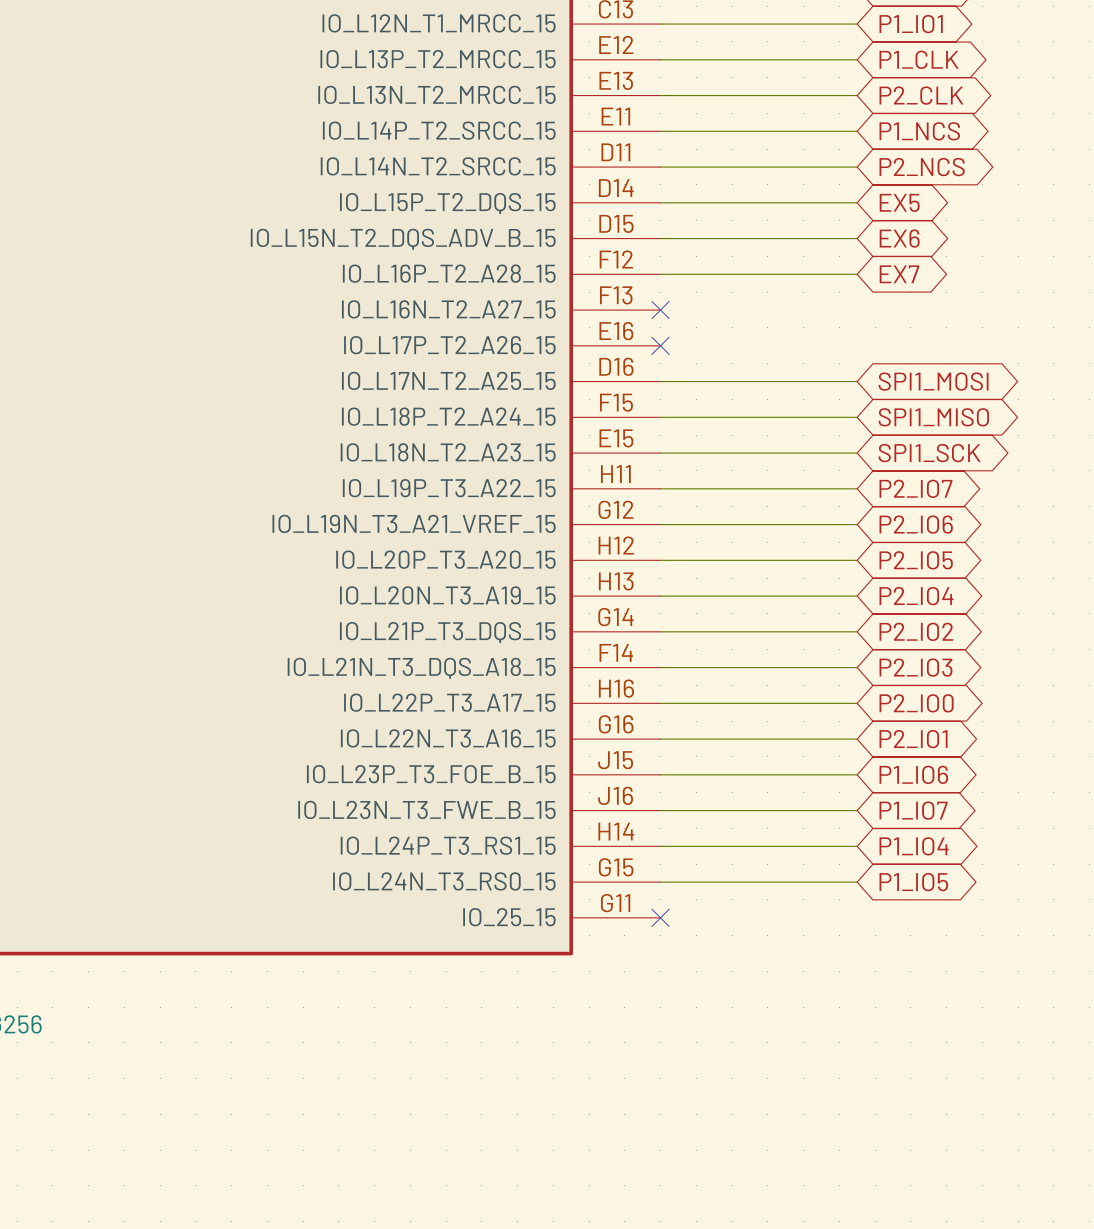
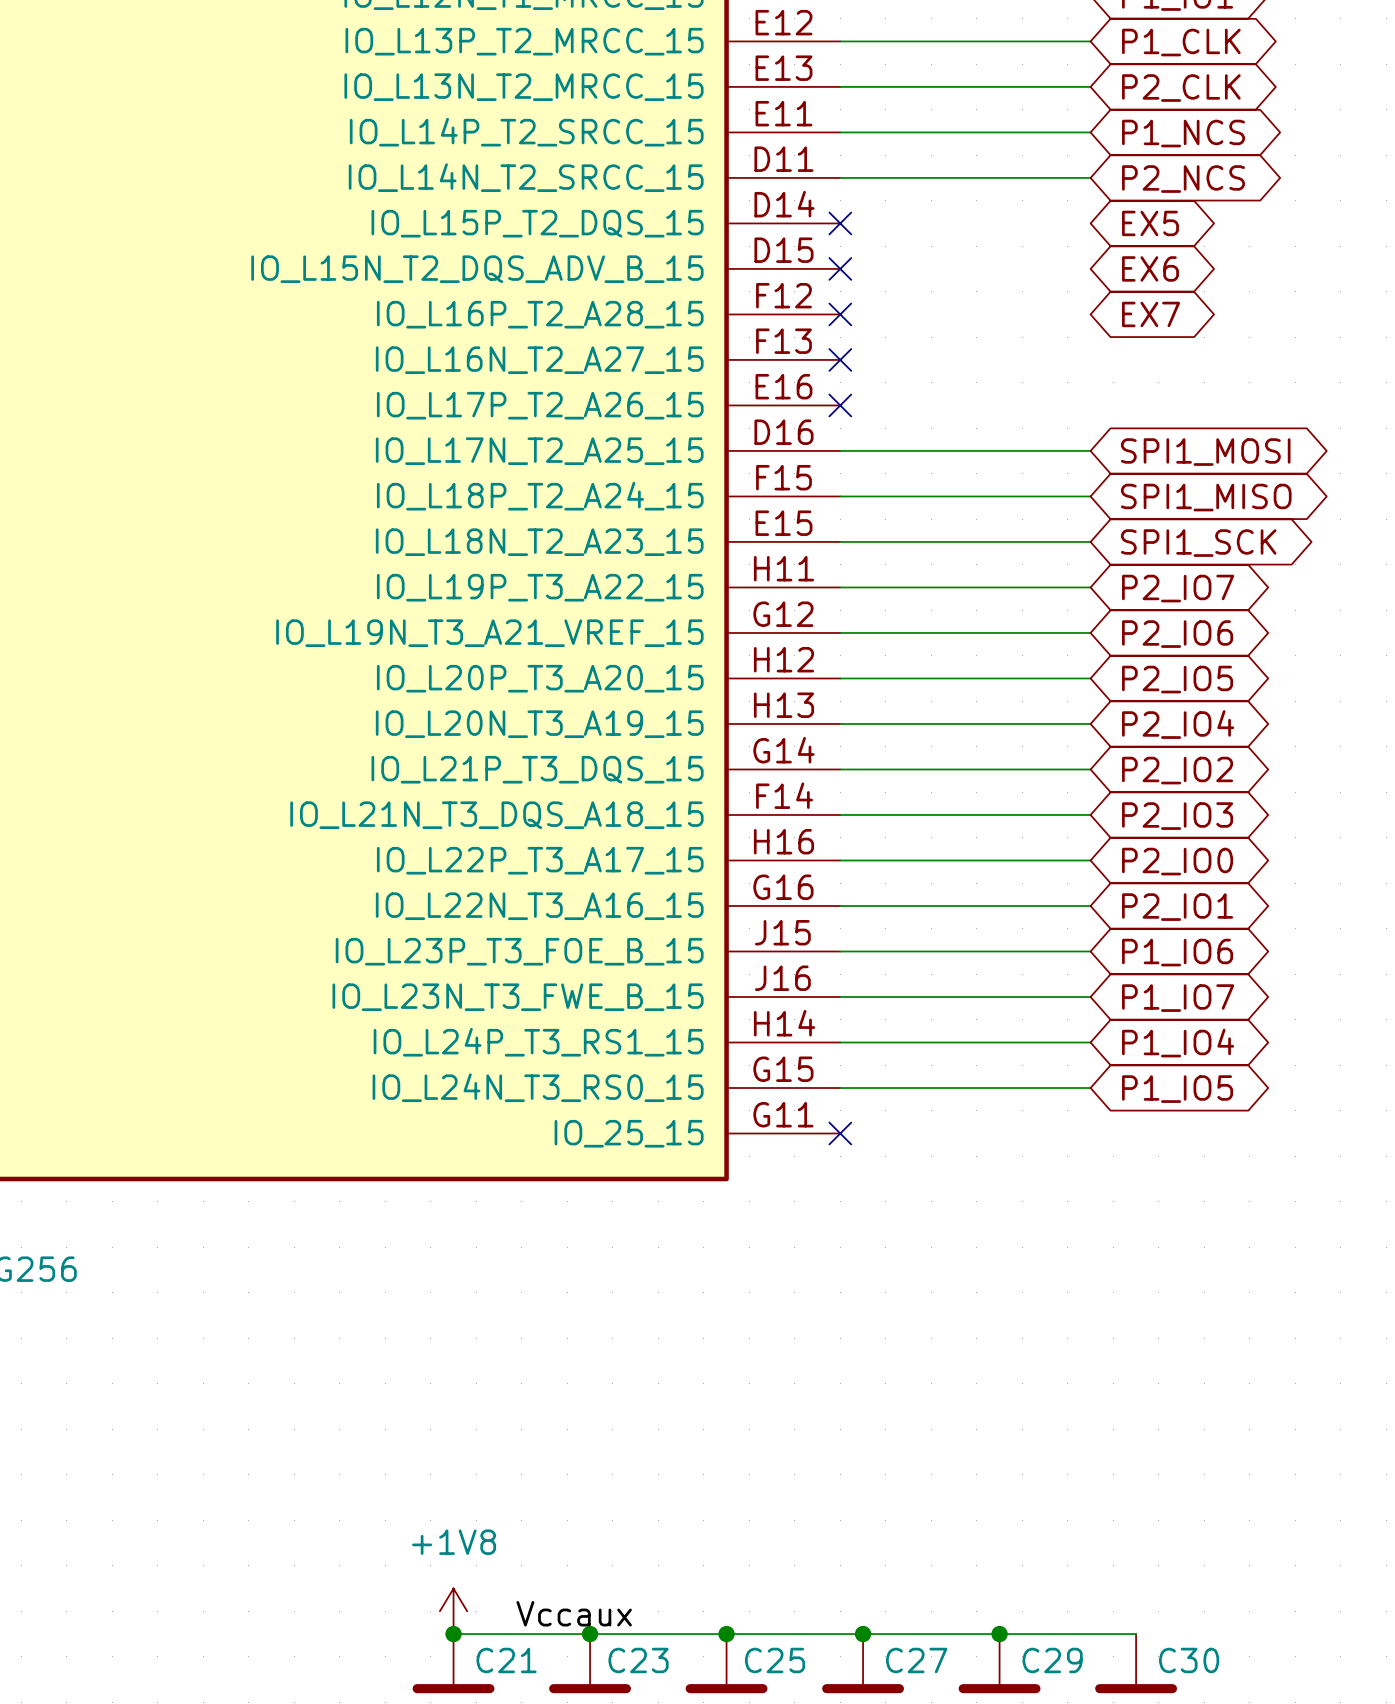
wire: (660, 202) (857, 202) -> none
no-connect mark: none -> (840, 223)
wire: (660, 238) (857, 238) -> none
no-connect mark: none -> (840, 268)
wire: (660, 274) (857, 274) -> none
no-connect mark: none -> (840, 314)

